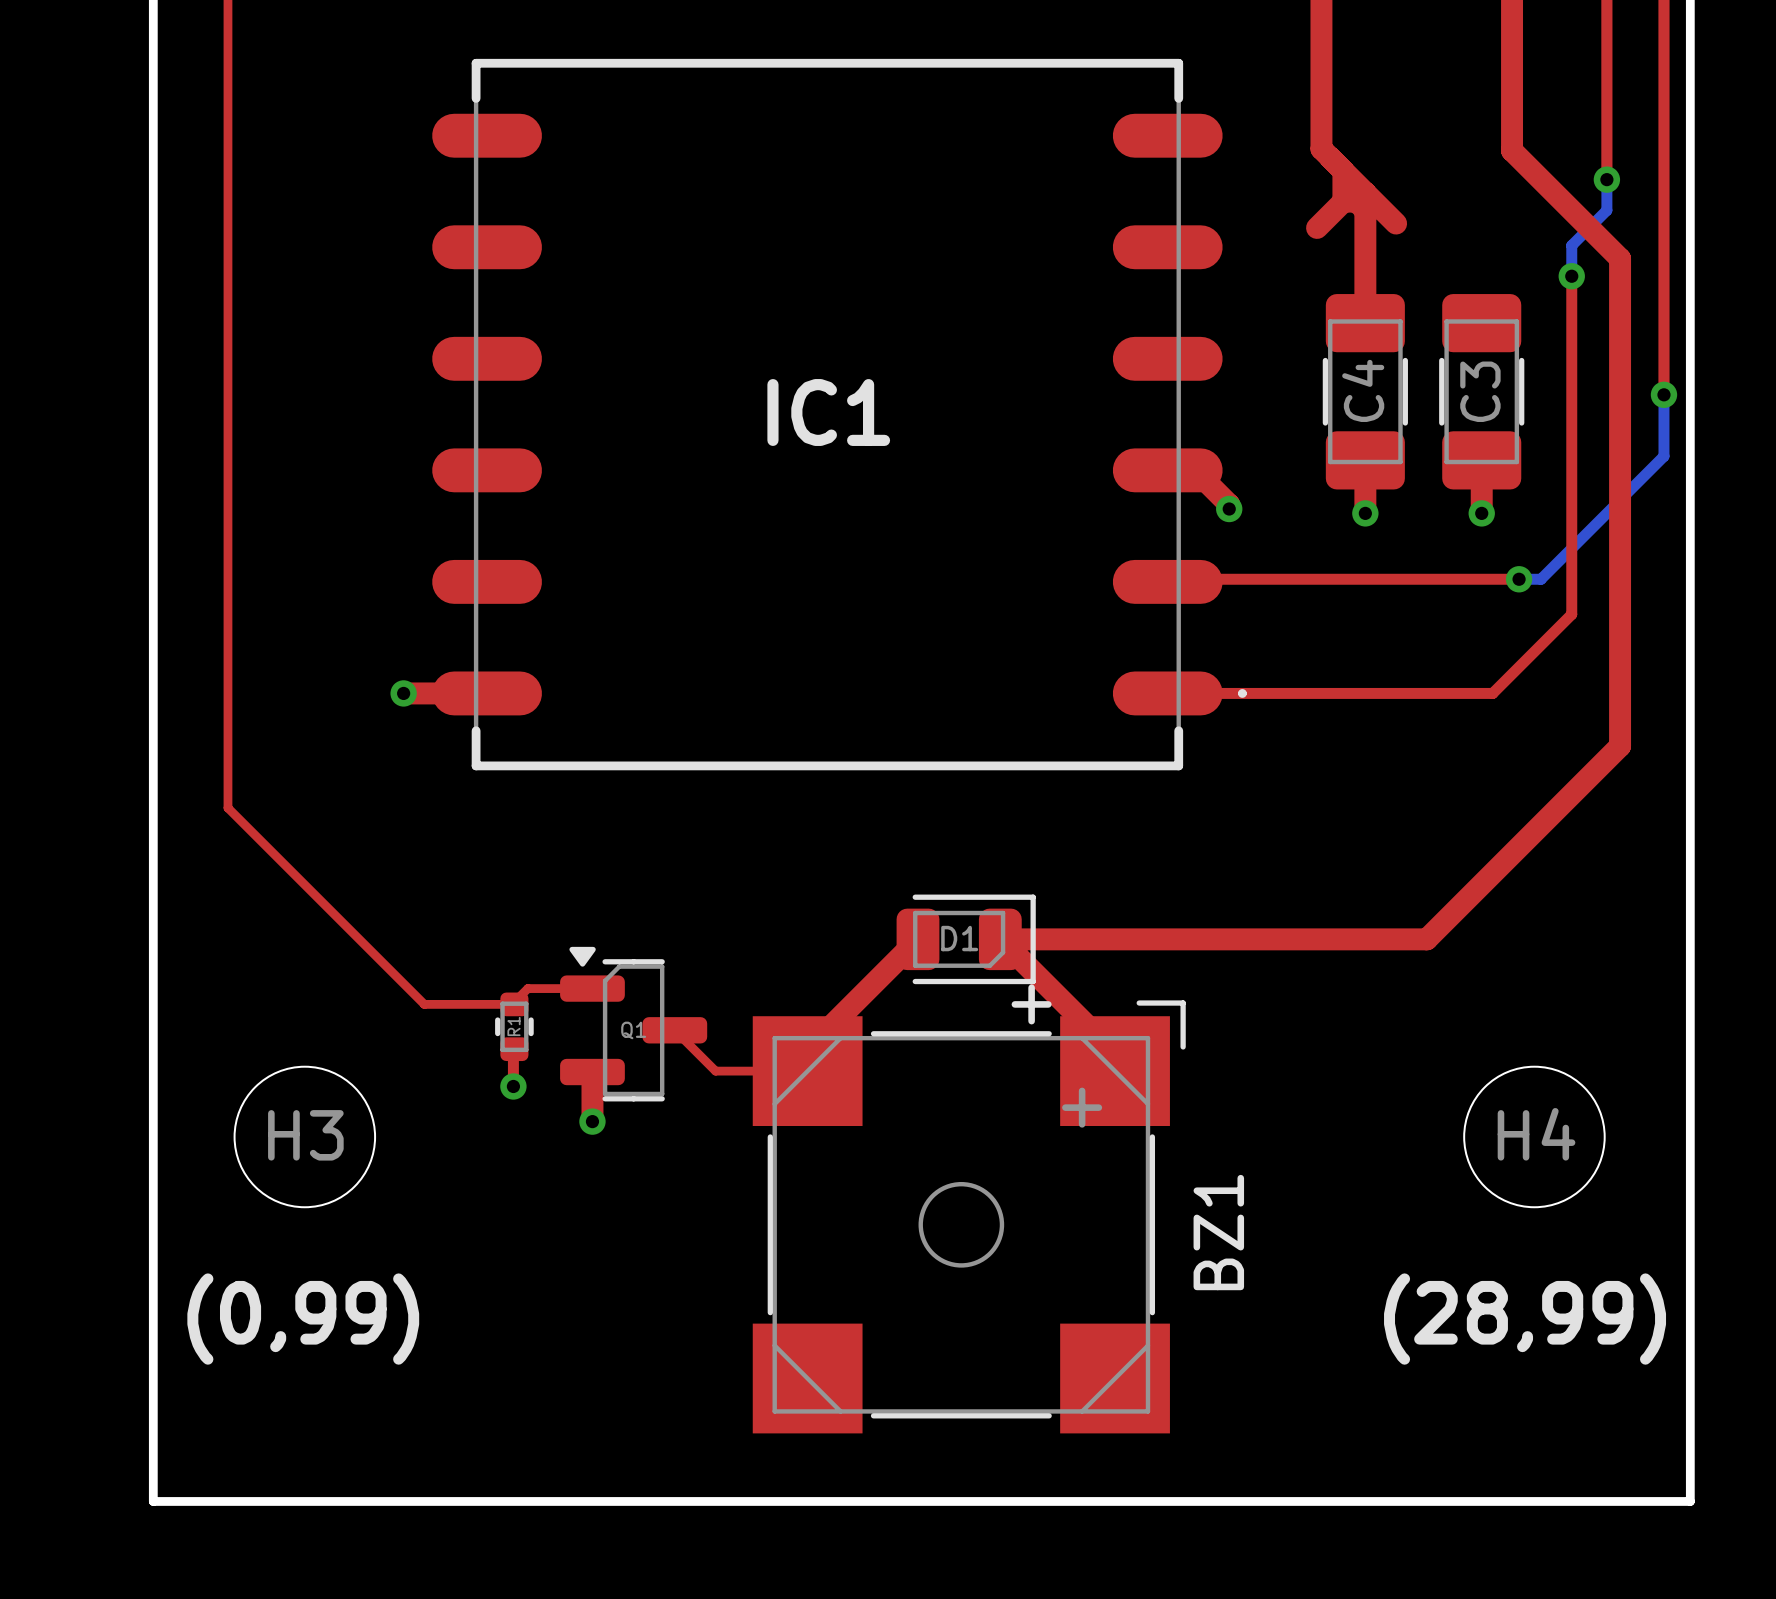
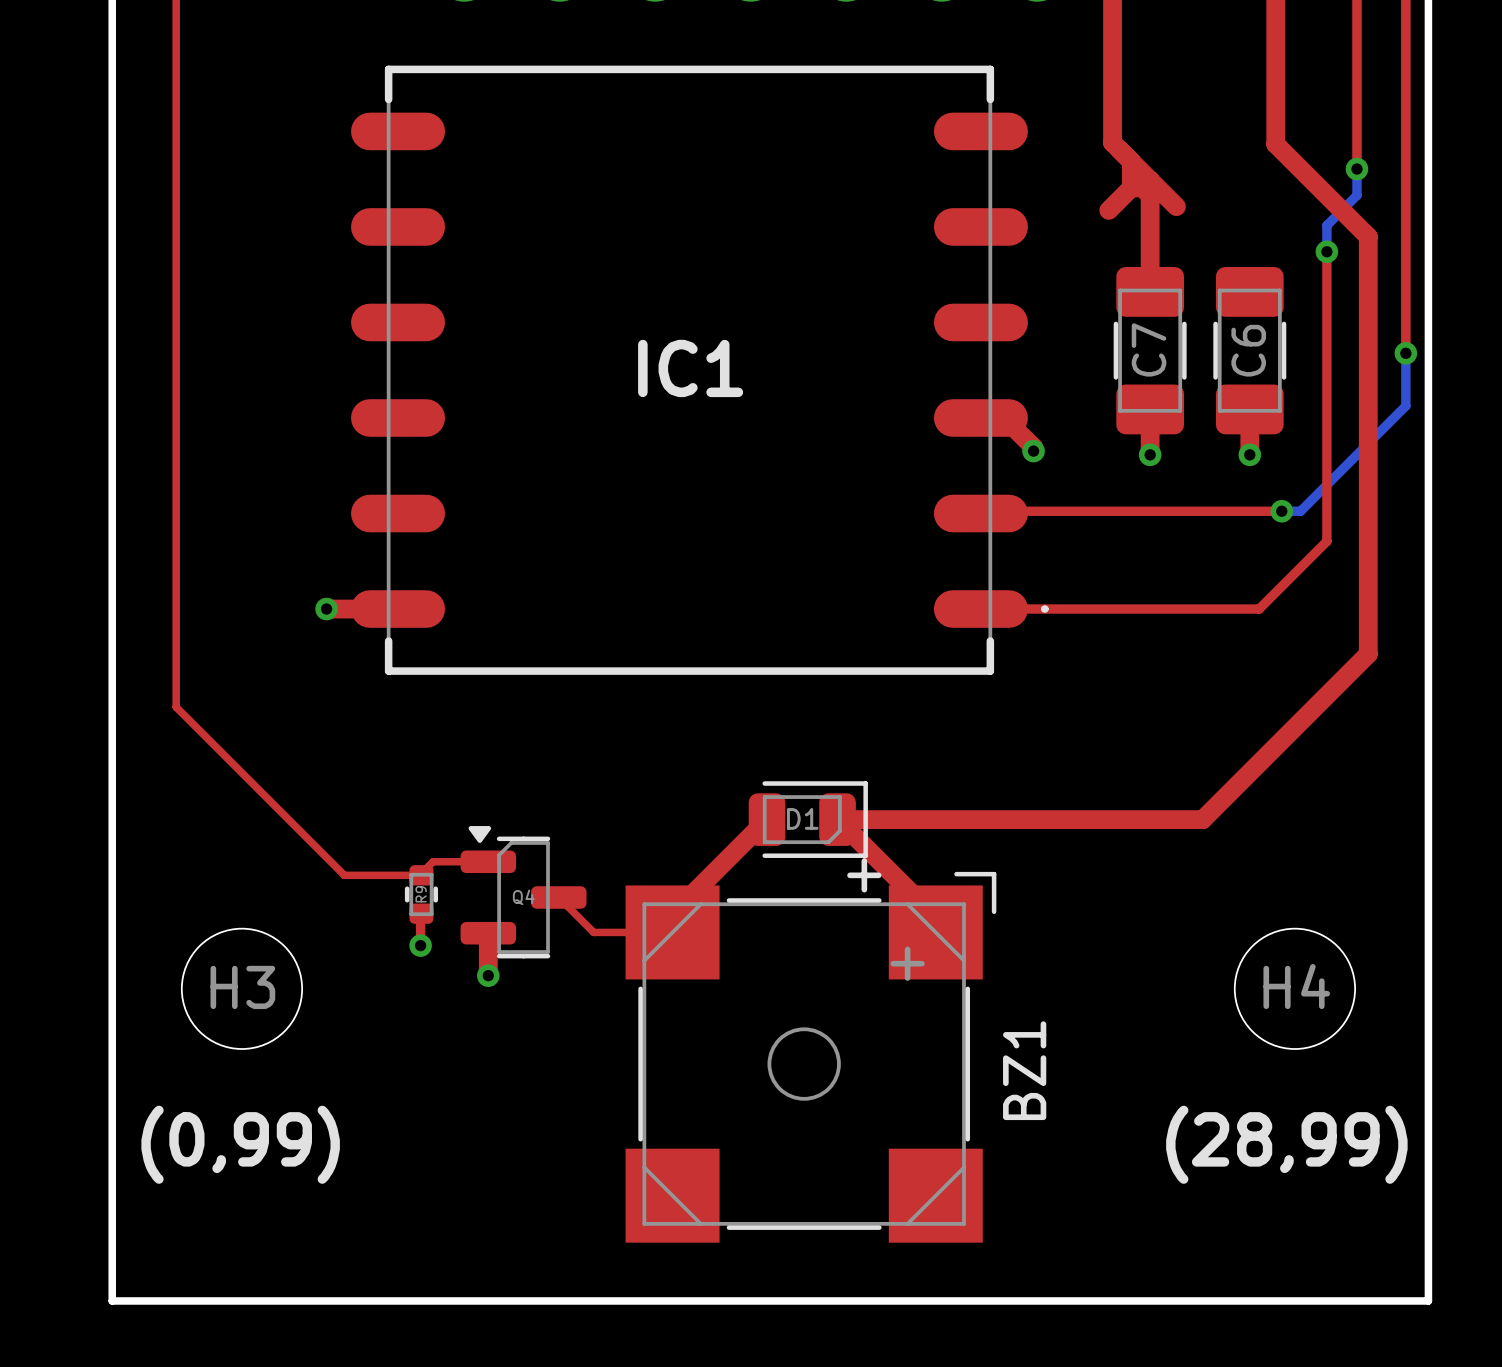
C4 name: C4 (1363, 390) -> C7 (1149, 349)
C3 name: C3 (1480, 391) -> C6 (1248, 350)
R1 name: R1 (513, 1026) -> R9 (421, 894)
Q1 name: Q1 (633, 1030) -> Q4 (523, 897)

